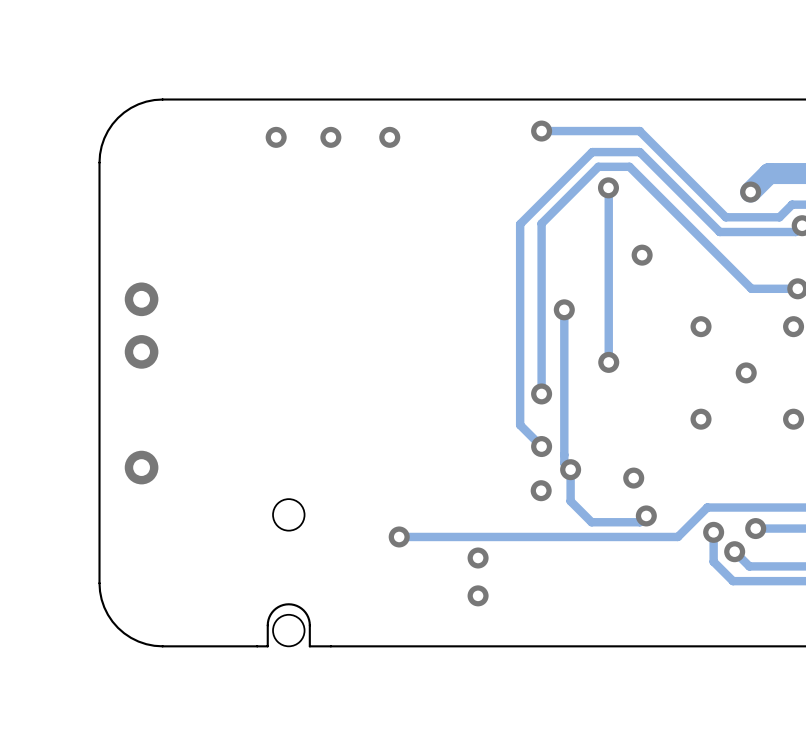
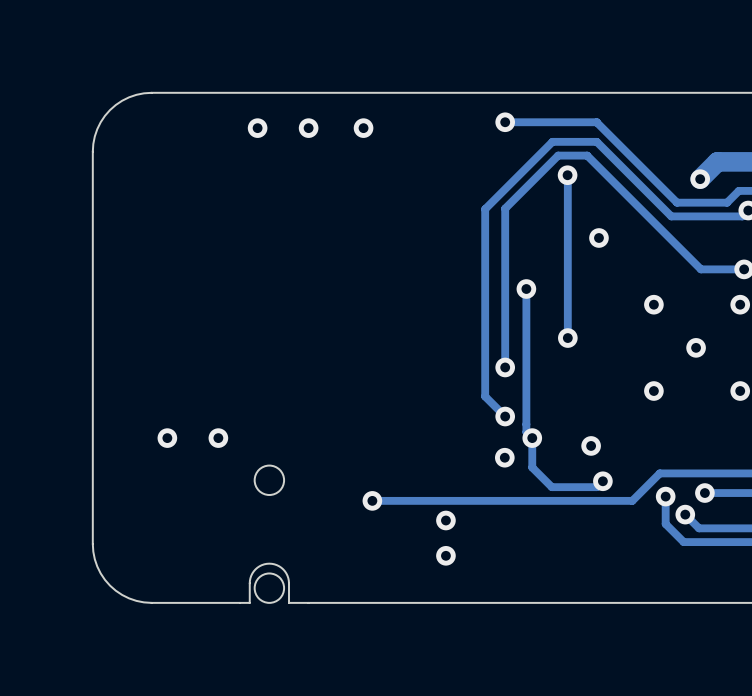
via: (141, 299) -> none
via: (141, 351) -> none
via: (141, 467) -> none
via: none -> (167, 438)
via: none -> (218, 438)

